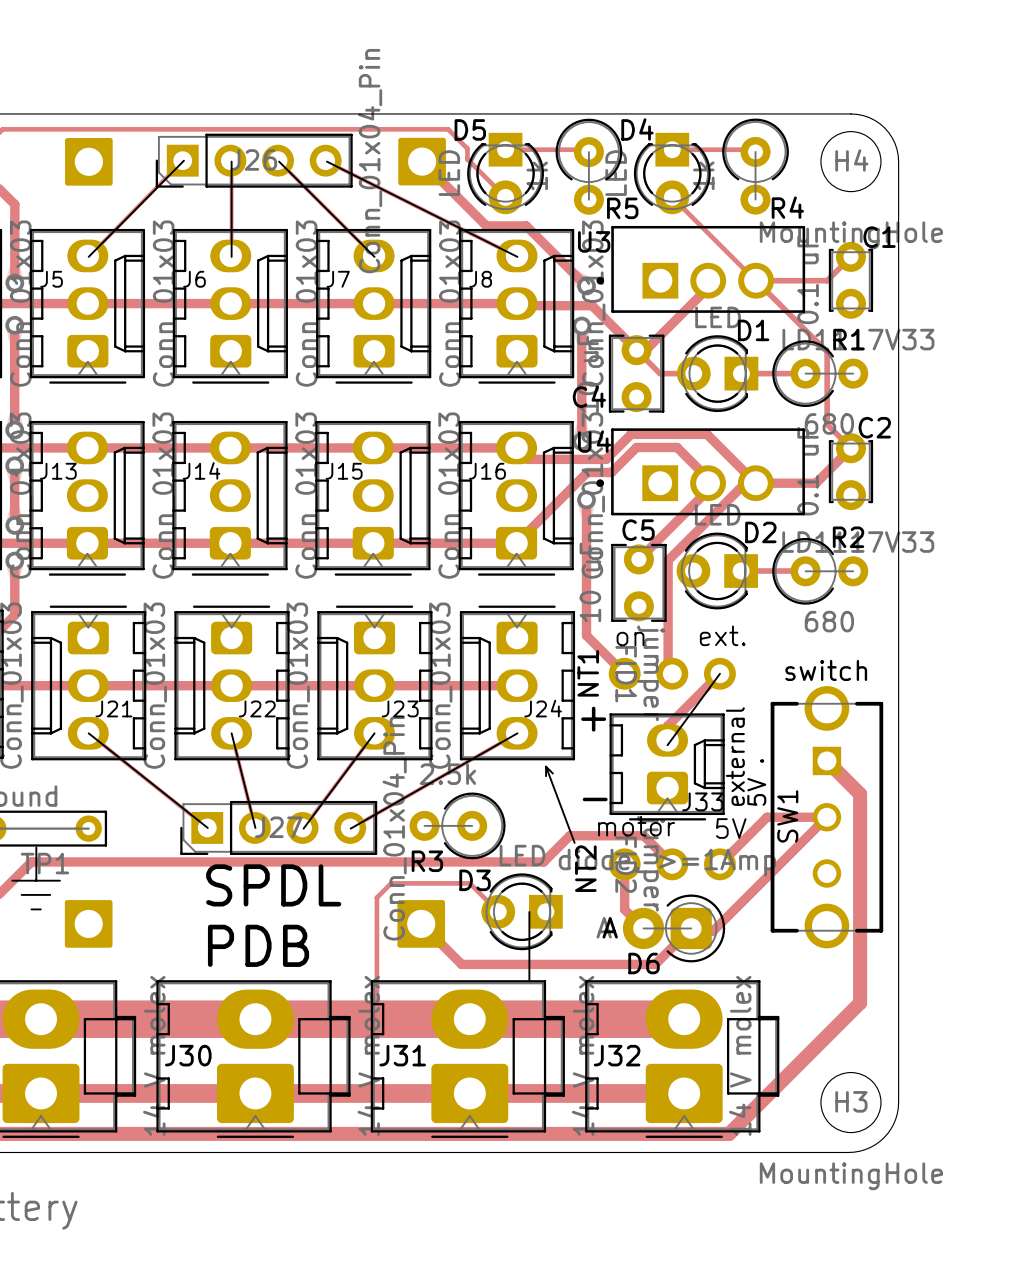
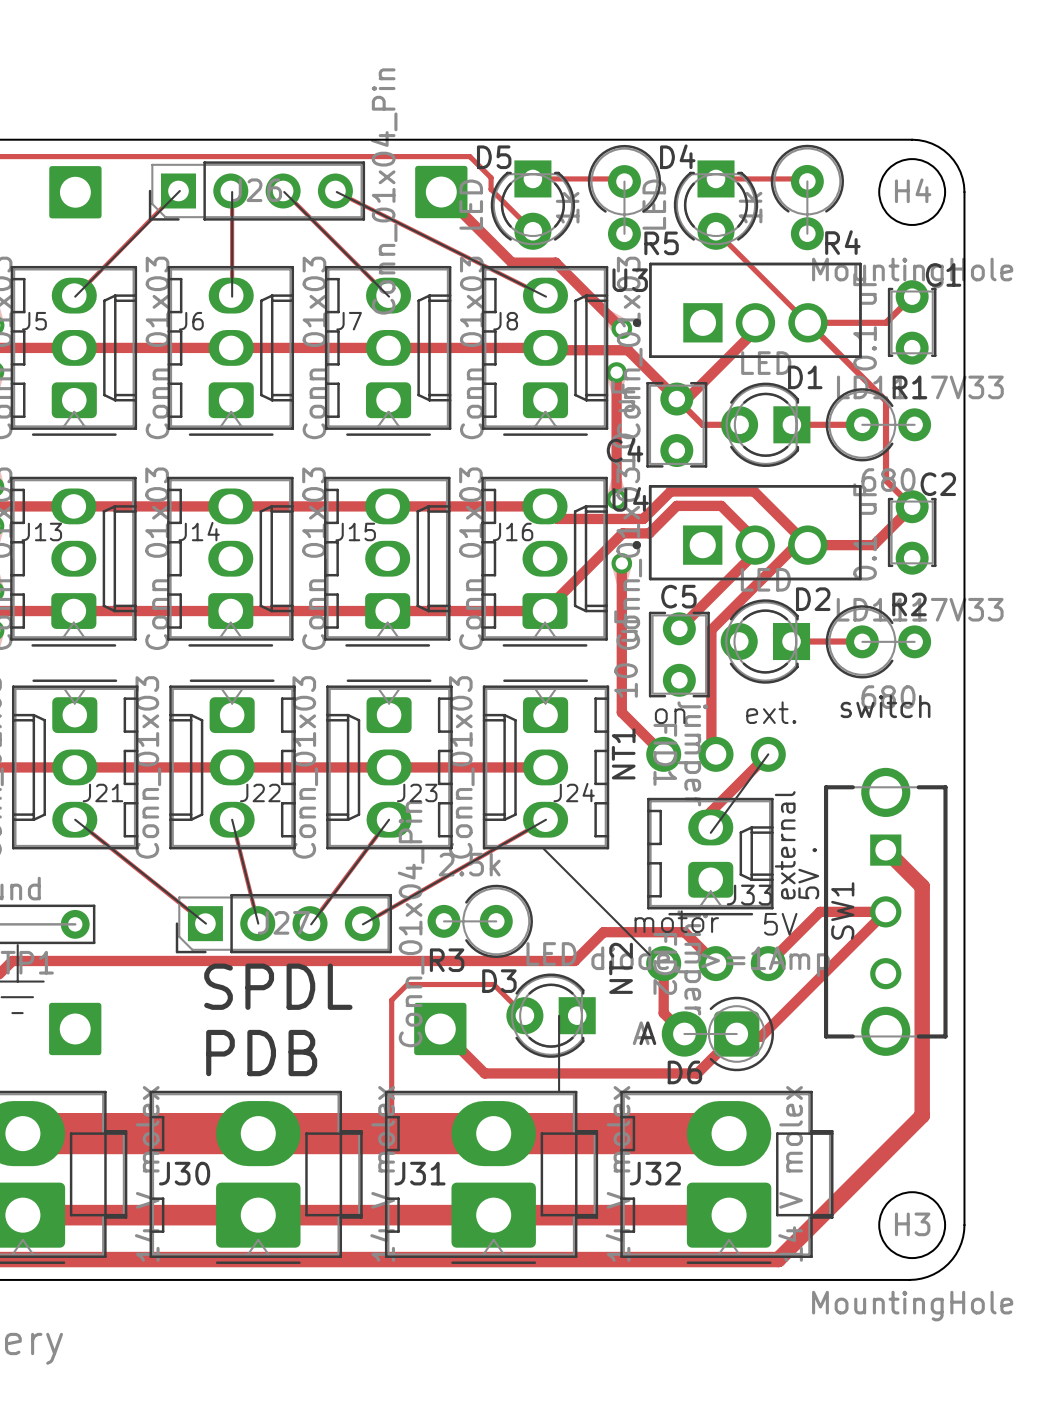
text position: switch (826, 670) -> switch (885, 706)
text: + (593, 719) -> none
line: none -> (543, 848) (649, 954)
line: (546, 766) (574, 842) -> none
line: (546, 766) (552, 773) -> none
line: (546, 766) (546, 776) -> none
text: - (595, 799) -> none

